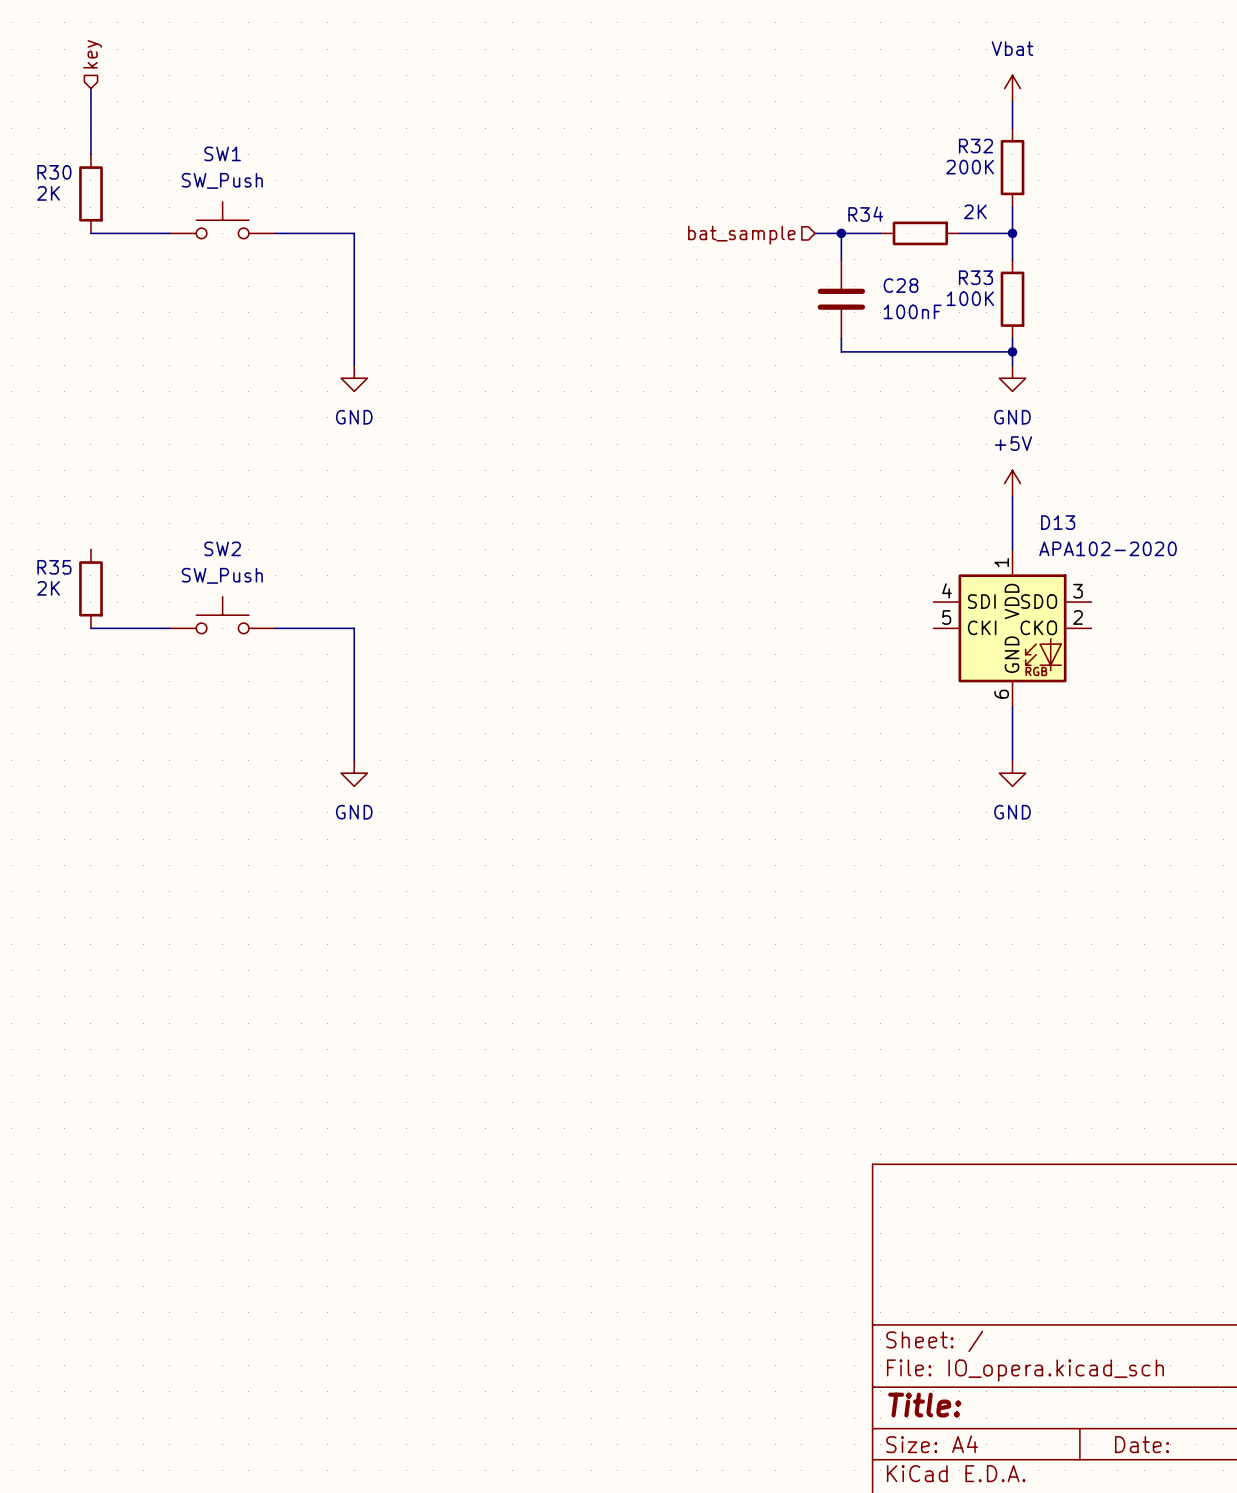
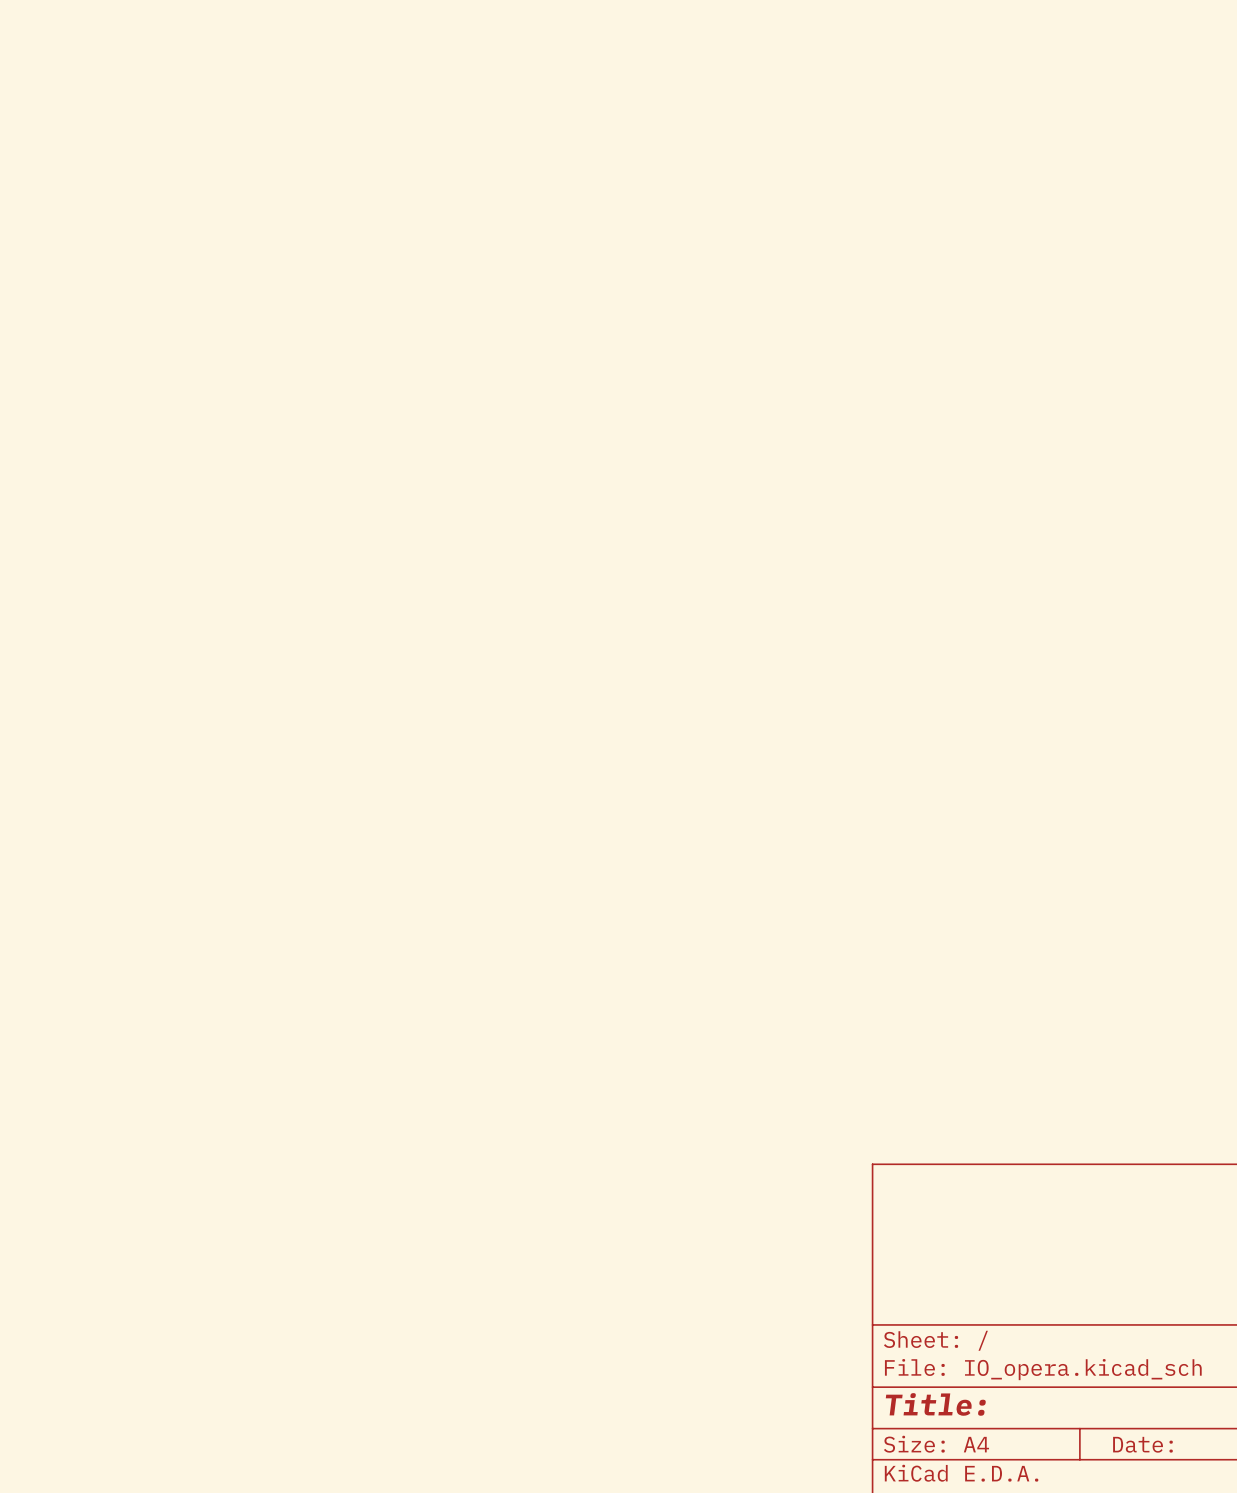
hierarchical label: key (92, 54) -> none
wire: (90, 88) (90, 154) -> none
power symbol: Vbat (1012, 88) -> none
wire: (1012, 101) (1012, 128) -> none
R32: 200K (1012, 167) -> none
R30: 2K (90, 193) -> none
wire: (1012, 207) (1012, 259) -> none
SW1: SW_Push (222, 220) -> none
wire: (90, 233) (169, 233) -> none
wire: (275, 233) (354, 233) (354, 365) -> none
wire: (815, 233) (880, 233) -> none
wire: (841, 233) (841, 259) -> none
junction: (841, 233) -> none
R34: 2K (920, 233) -> none
wire: (959, 233) (1012, 233) -> none
junction: (1012, 233) -> none
hierarchical label: bat_sample (741, 235) -> none
C28: 100nF (841, 299) -> none
R33: 100K (1012, 299) -> none
wire: (841, 338) (841, 351) (1012, 351) -> none
wire: (1012, 338) (1012, 365) -> none
junction: (1012, 351) -> none
power symbol: GND (354, 378) -> none
power symbol: GND (1012, 378) -> none
power symbol: +5V (1012, 483) -> none
wire: (1012, 496) (1012, 549) -> none
R35: 2K (90, 588) -> none
SW2: SW_Push (222, 615) -> none
wire: (90, 628) (169, 628) -> none
wire: (275, 628) (354, 628) (354, 760) -> none
D13: APA102-2020 (1012, 628) -> none
wire: (1012, 707) (1012, 760) -> none
power symbol: GND (354, 773) -> none
power symbol: GND (1012, 773) -> none

